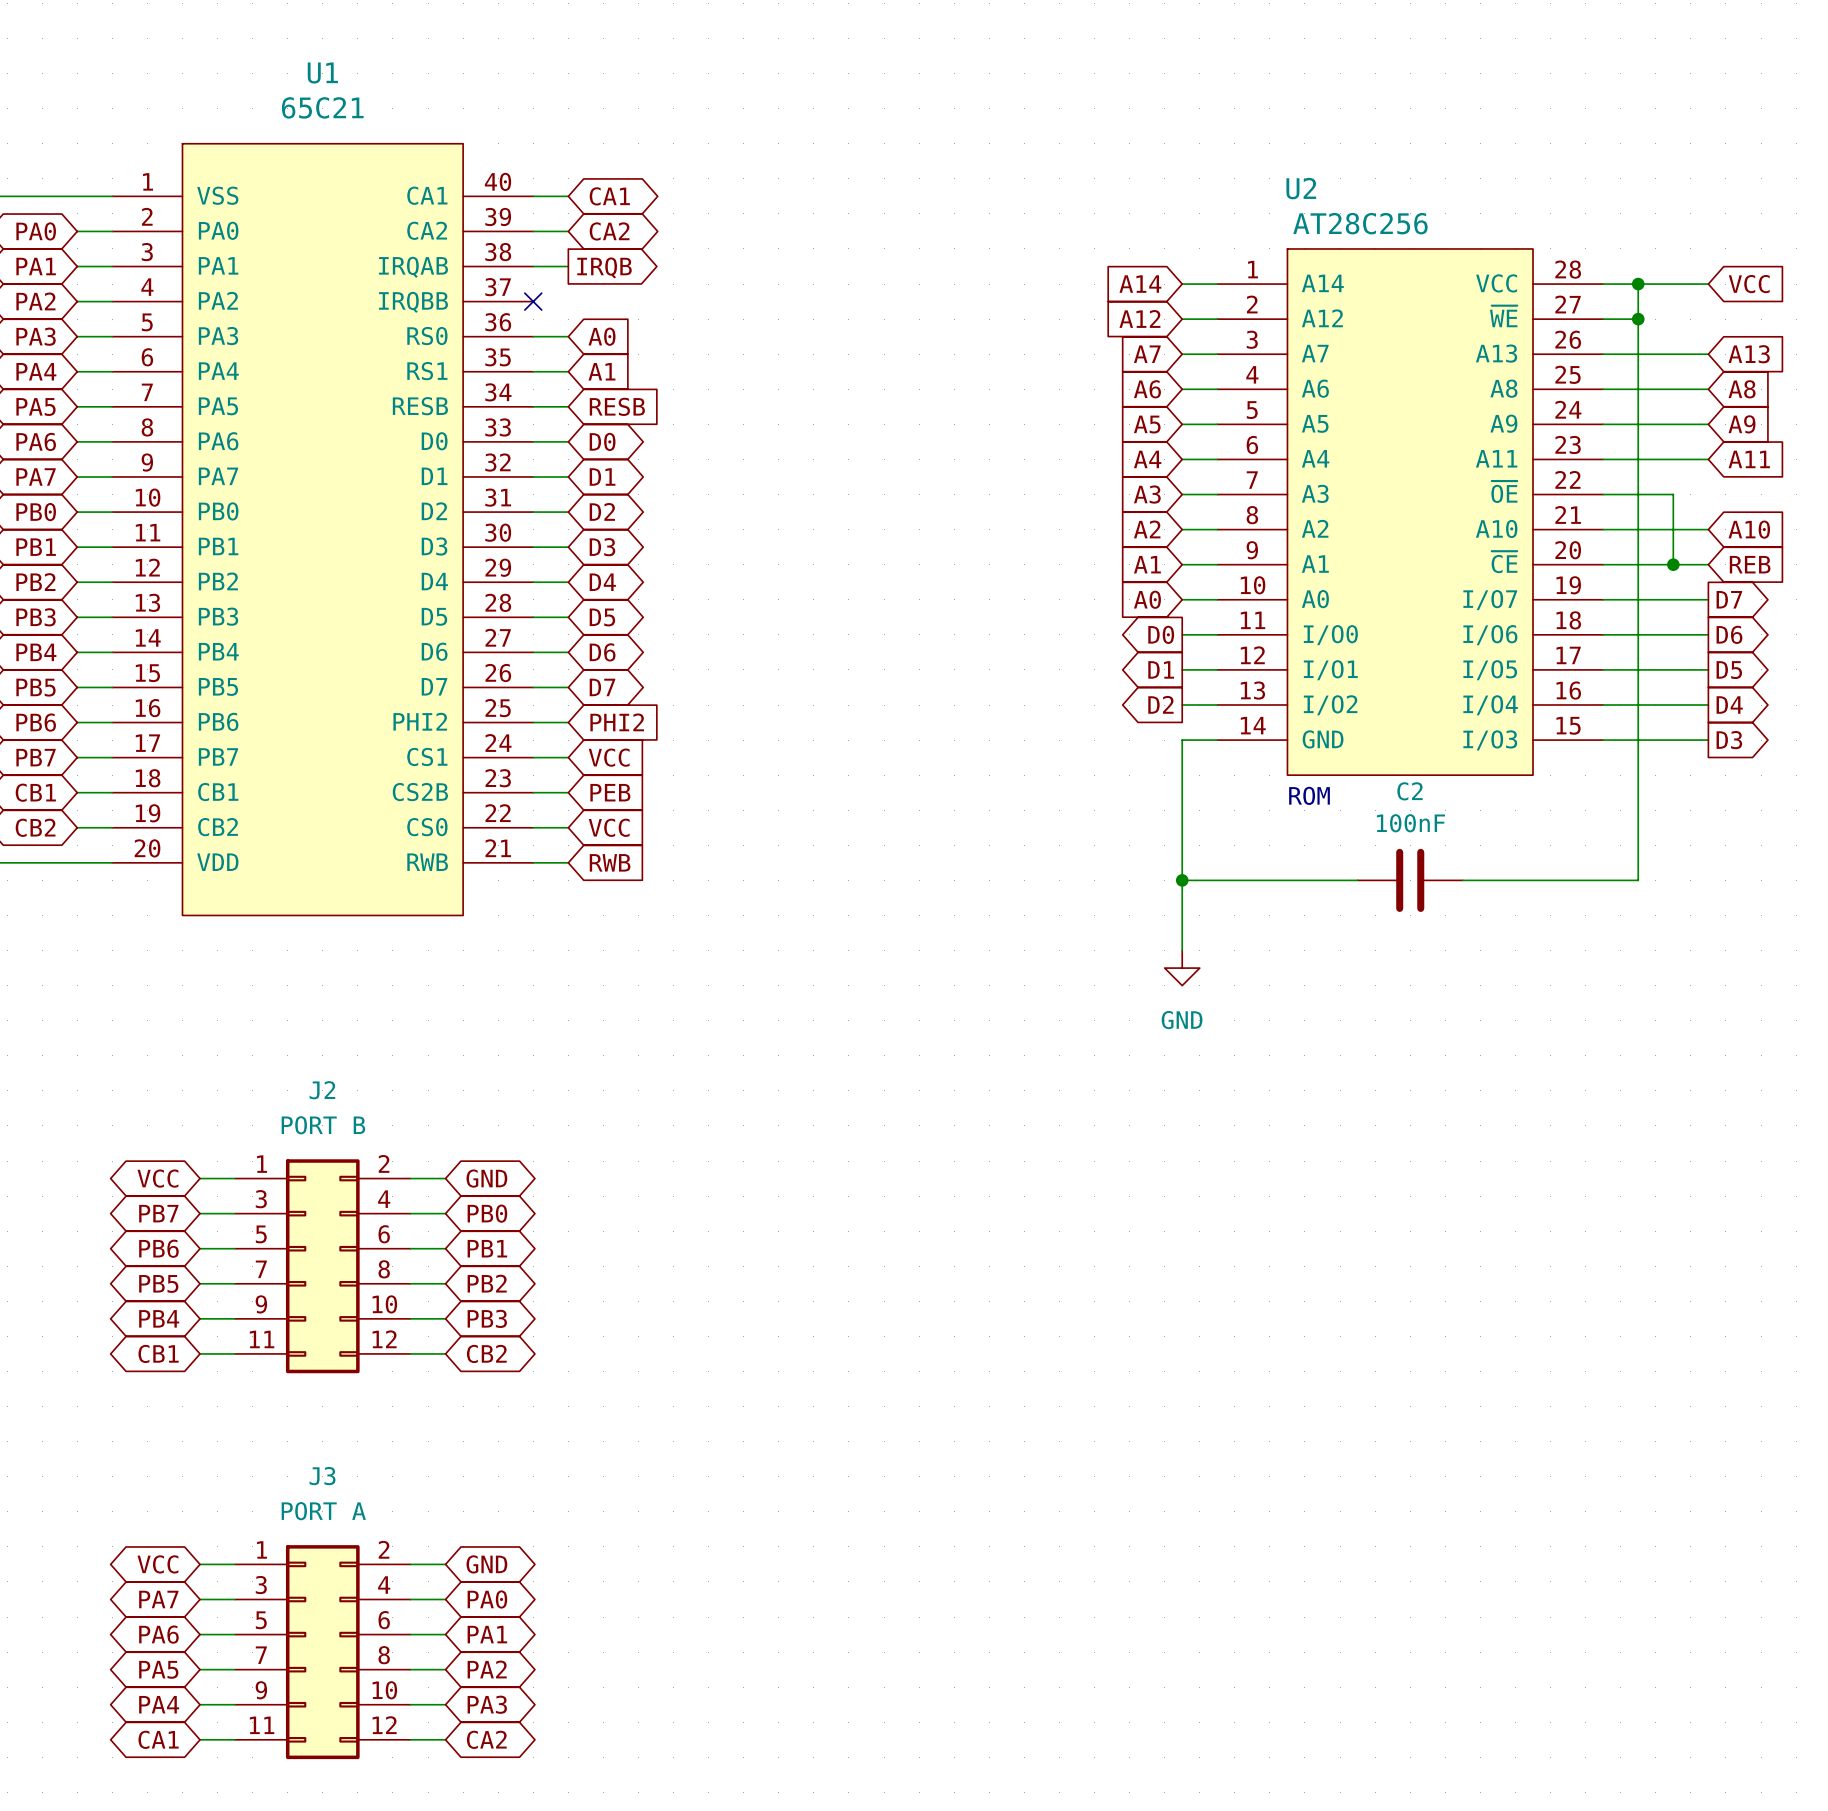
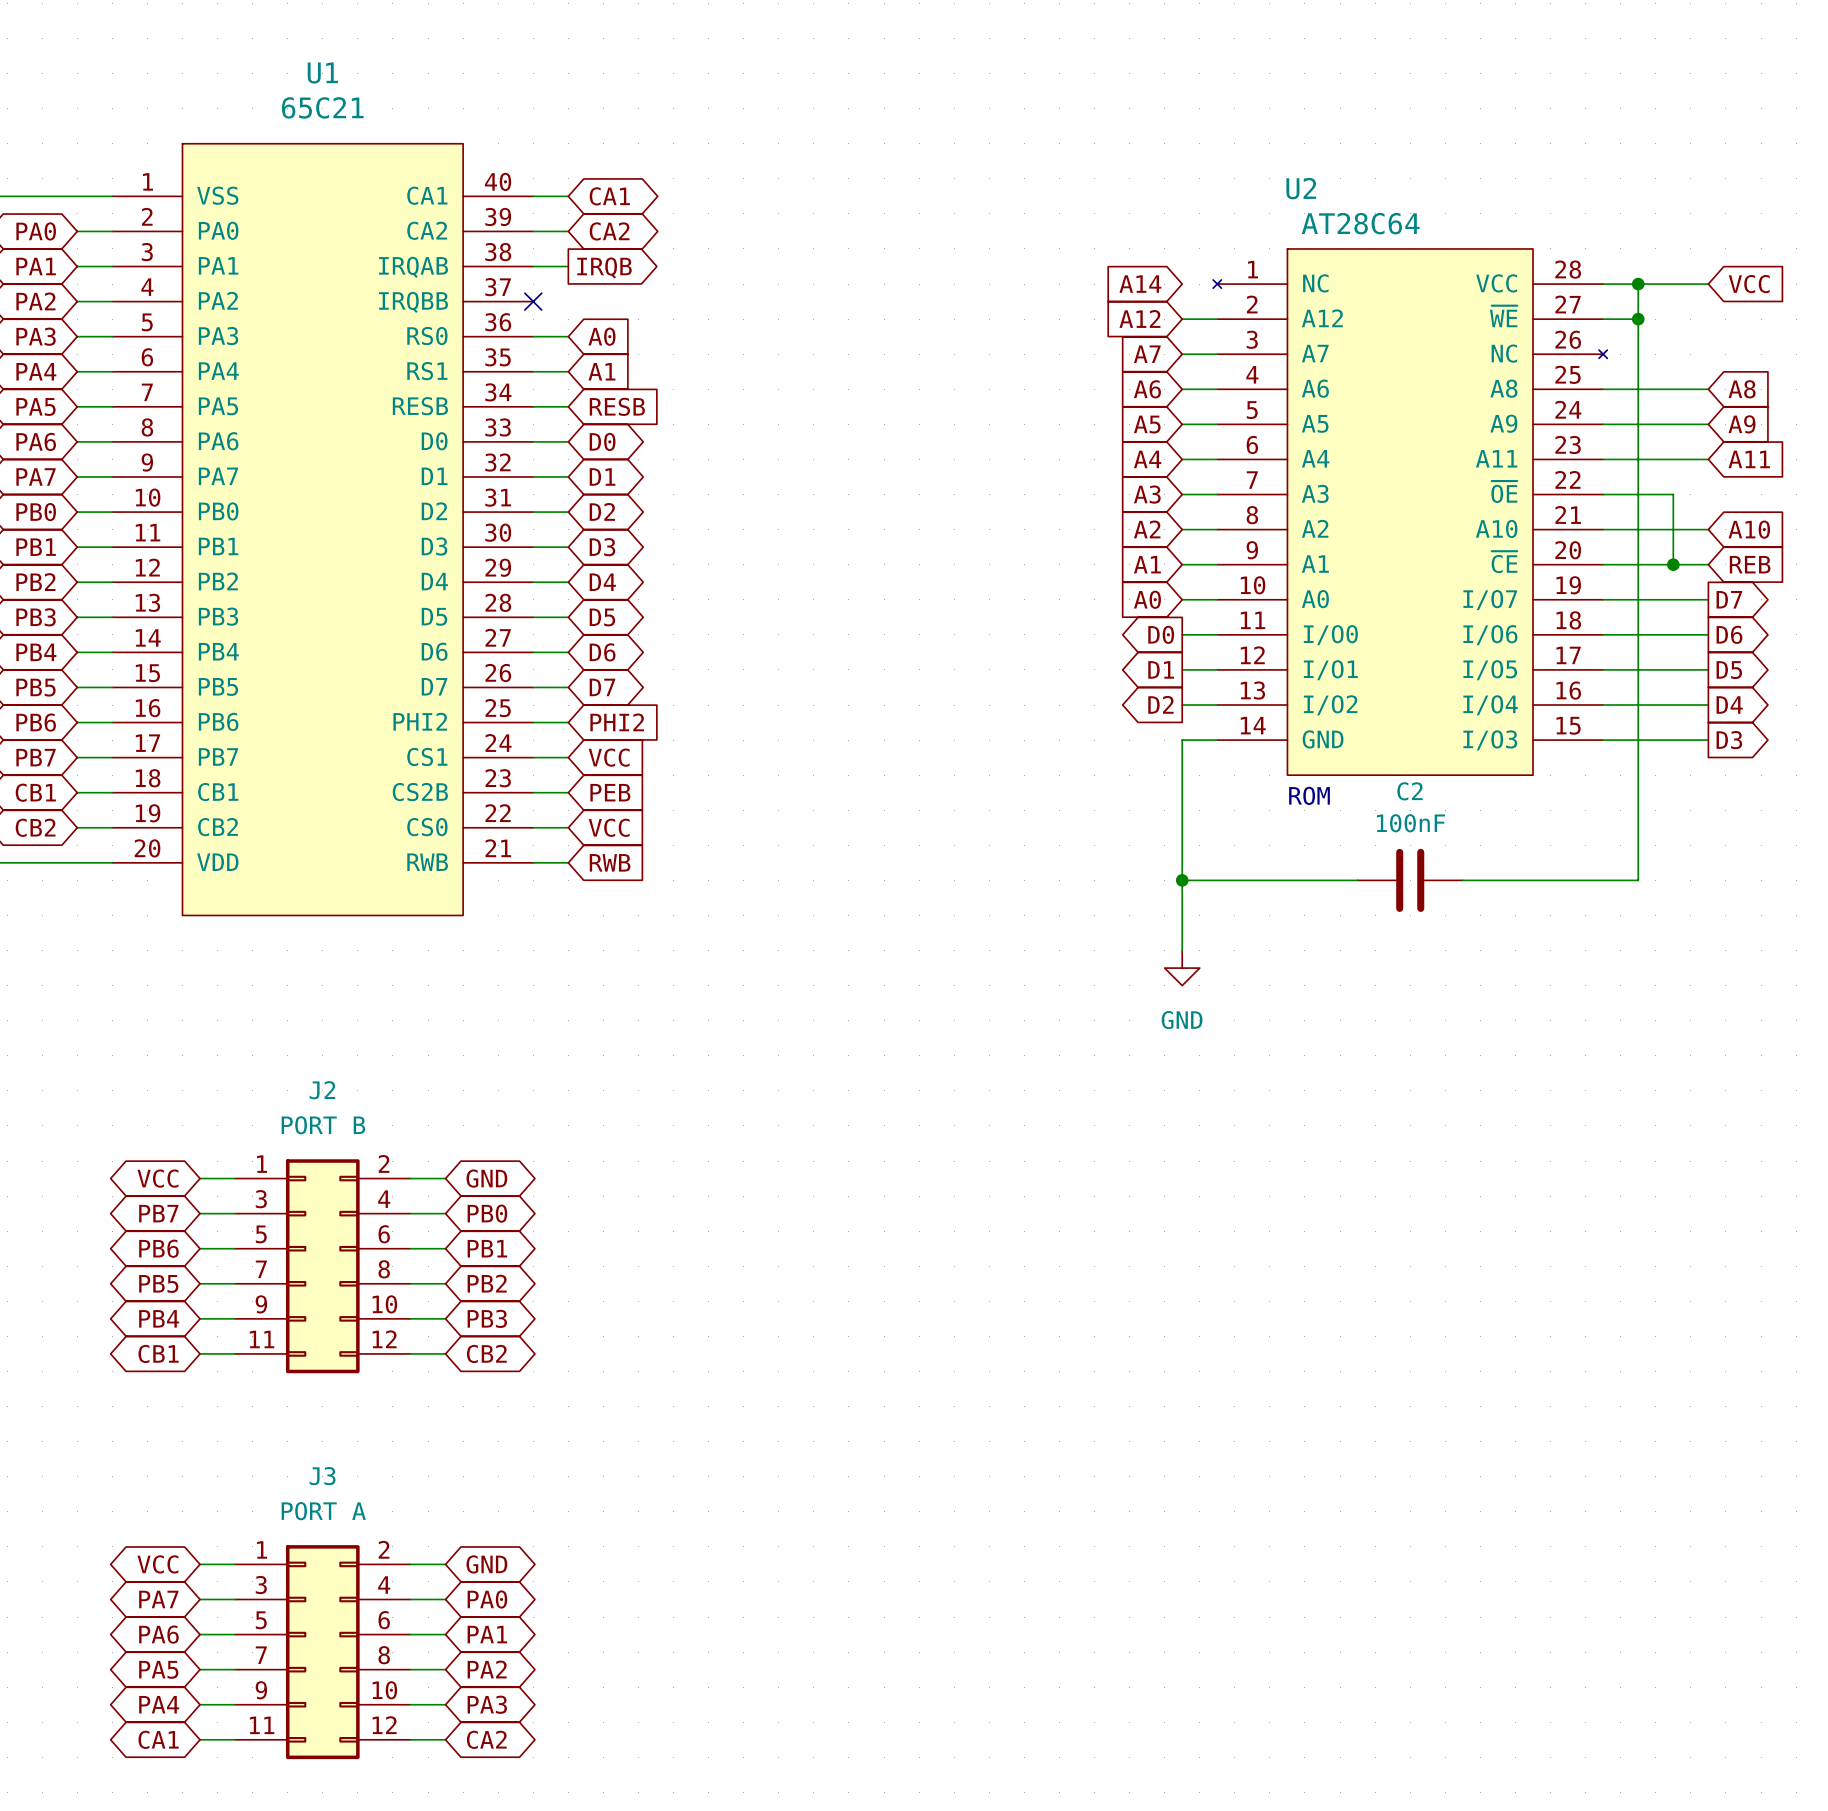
U2 value: AT28C256 (1360, 223) -> AT28C64 (1360, 223)
U2 symbol: [1217, 248, 1604, 776] -> [1213, 248, 1608, 776]
wire: (1182, 284) (1217, 284) -> none
wire: (1603, 354) (1708, 354) -> none
global label: A13 (1749, 354) -> none

